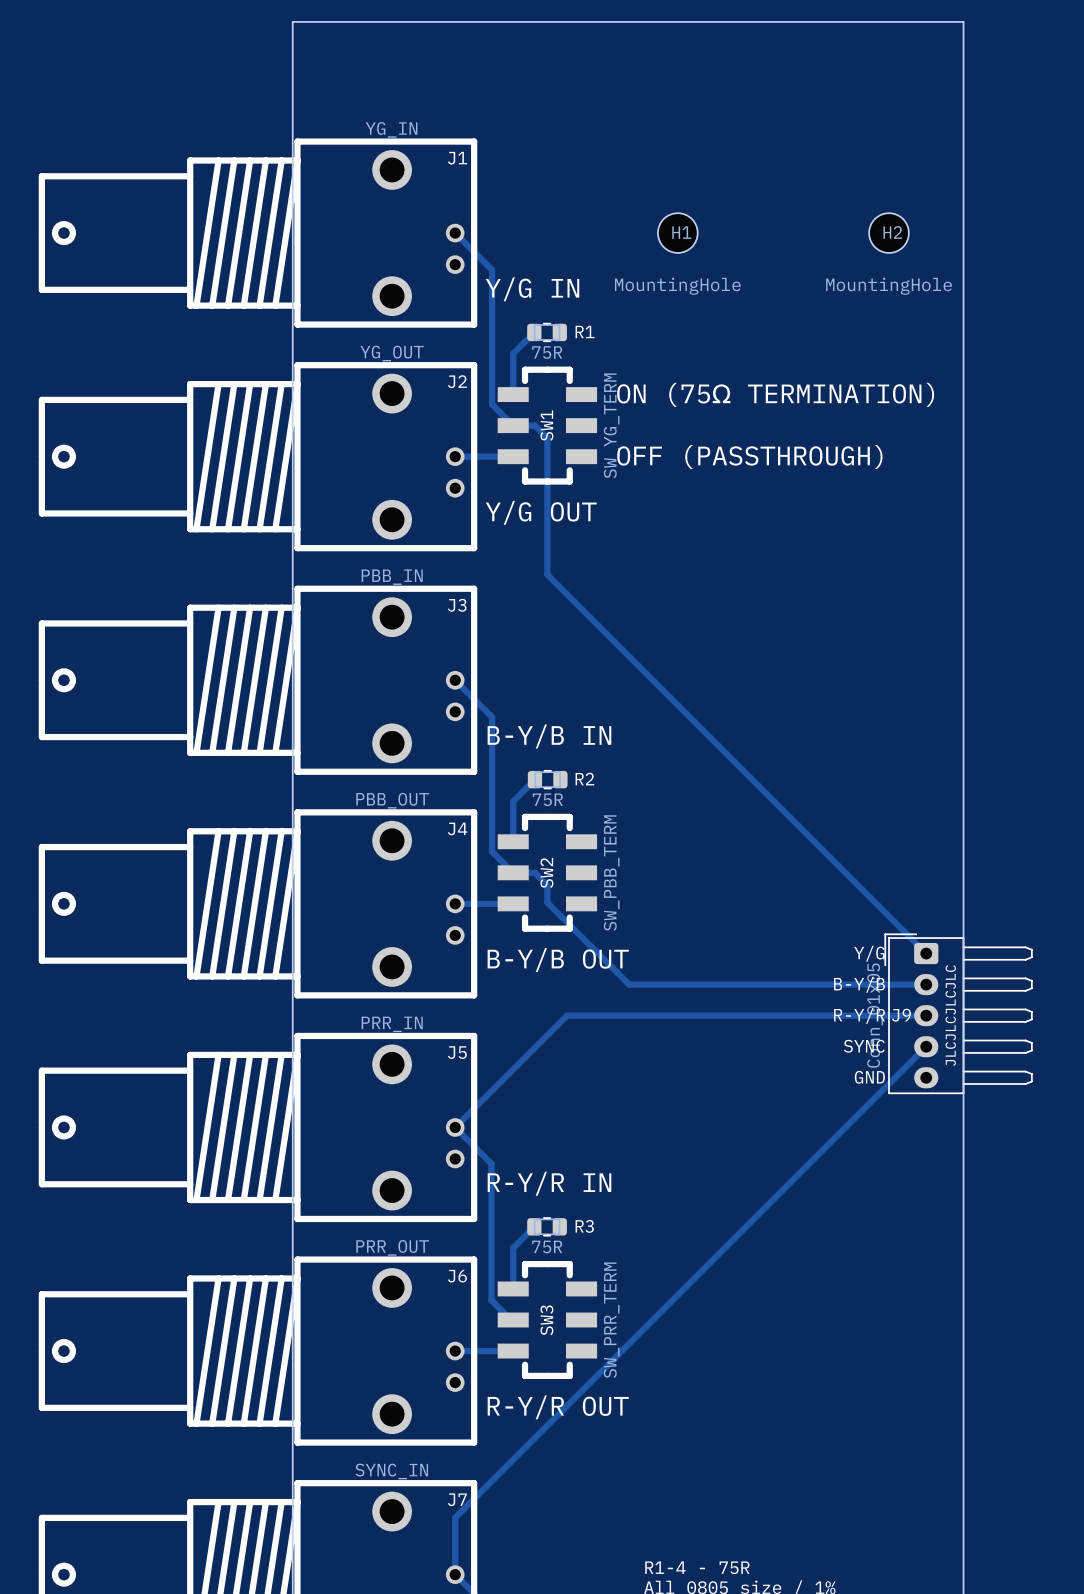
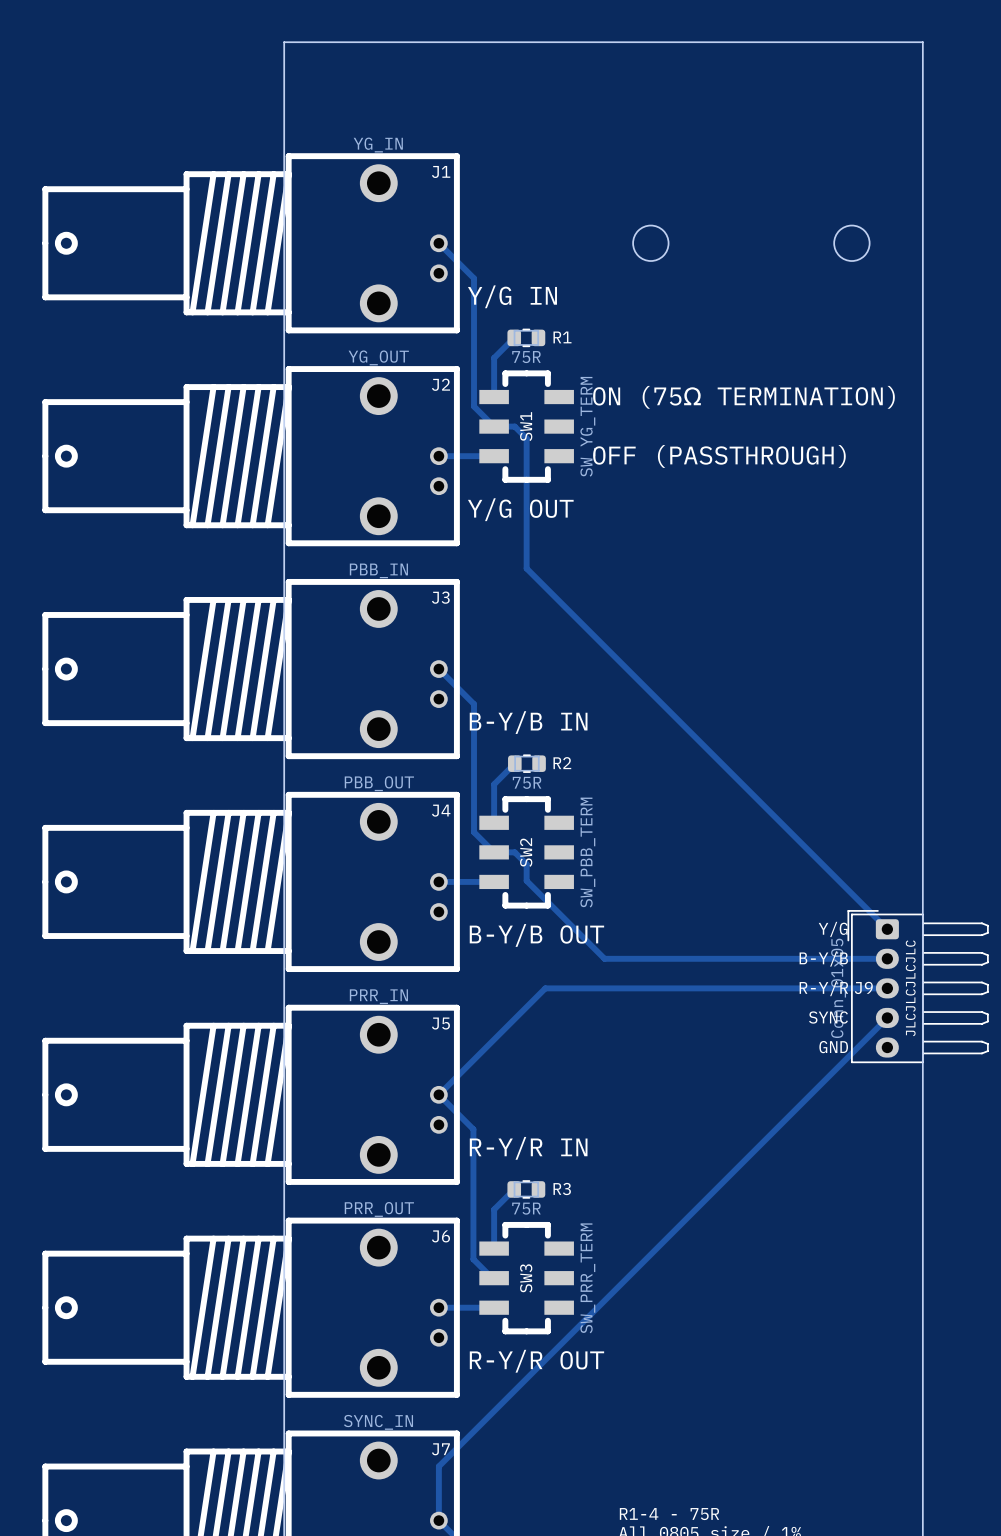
round board edge: none -> [632, 225, 669, 262]
round board edge: none -> [833, 225, 870, 262]
H1: MountingHole (677, 233) -> none
H2: MountingHole (888, 233) -> none

